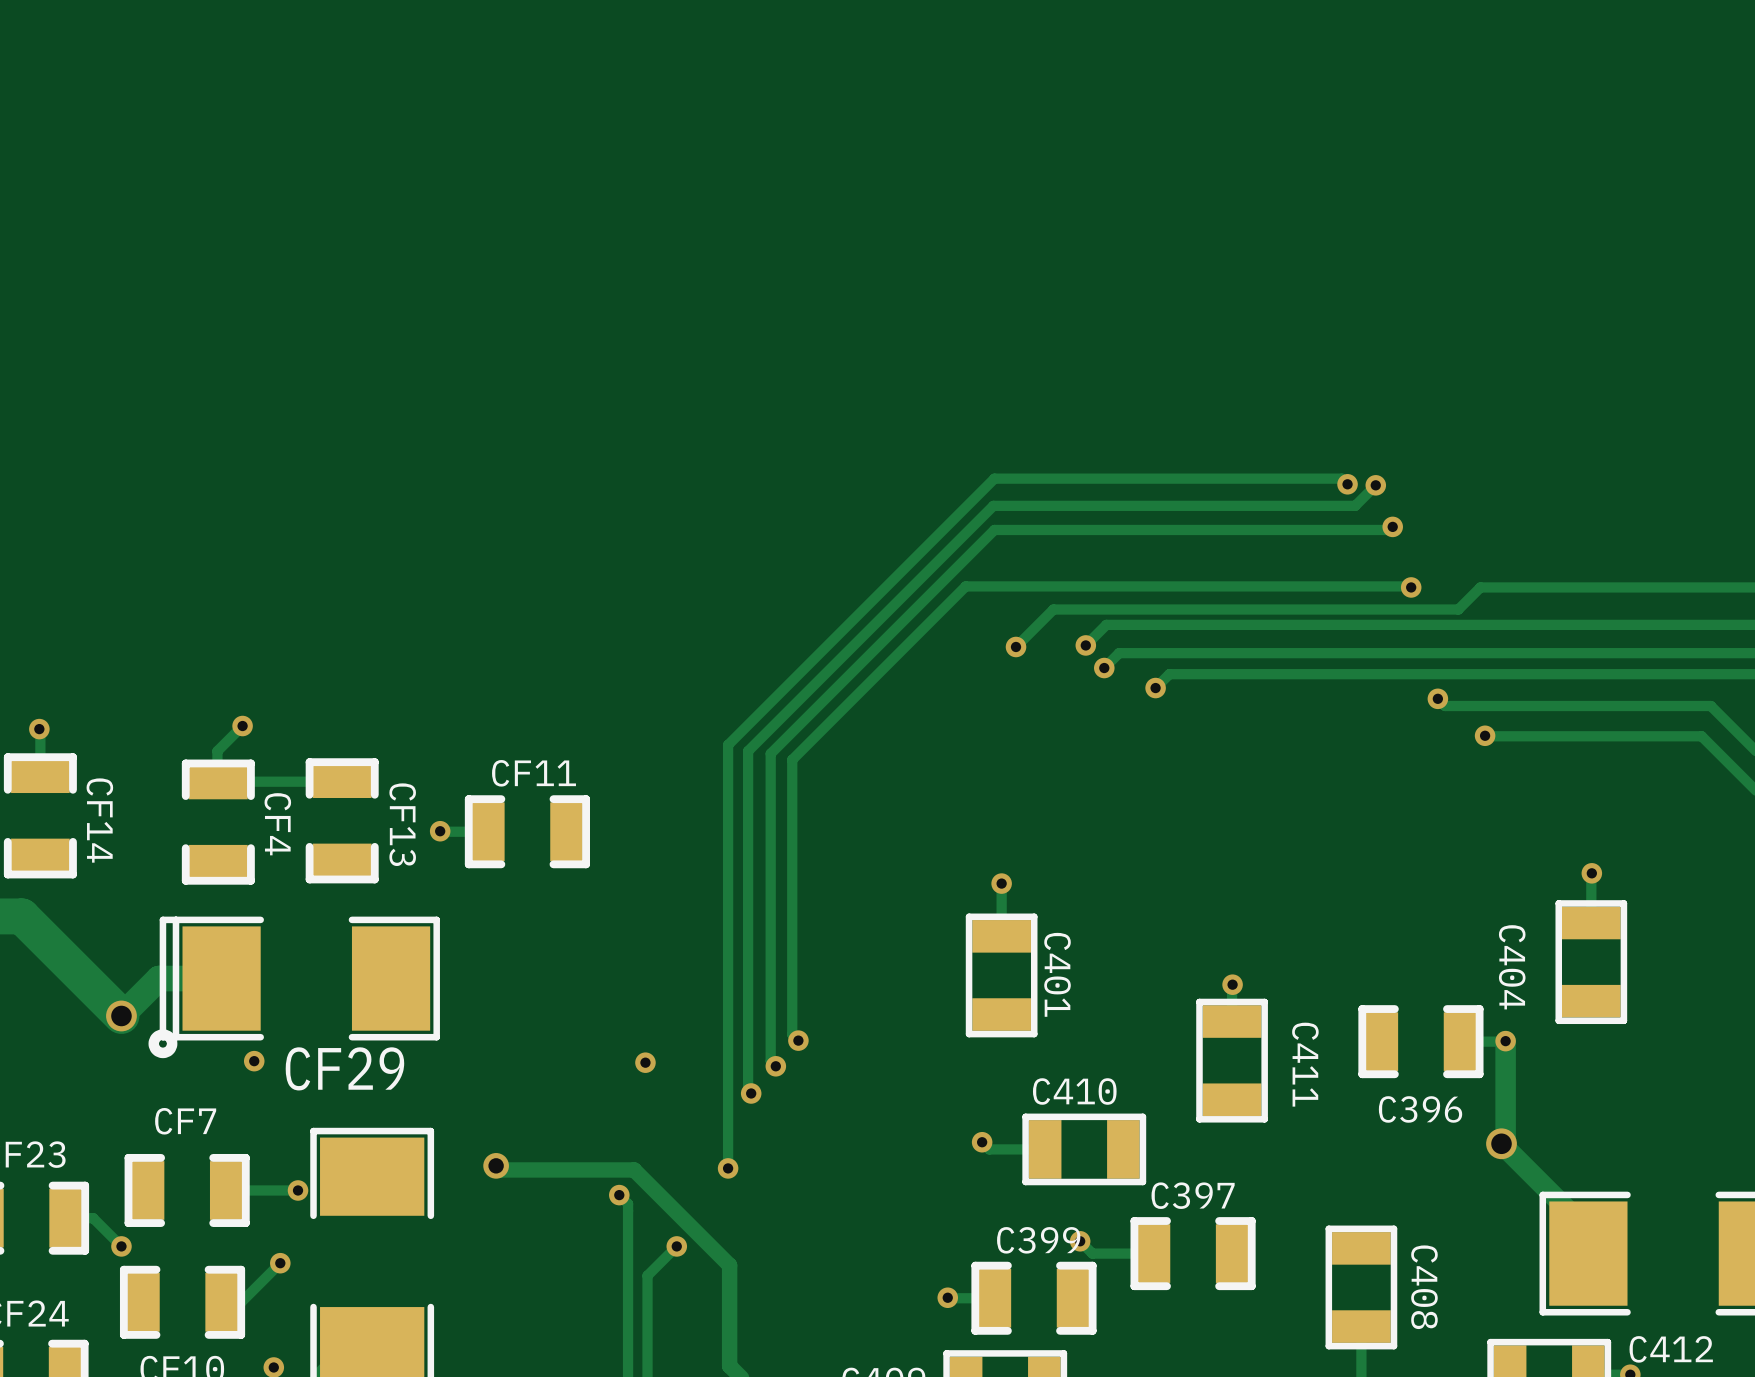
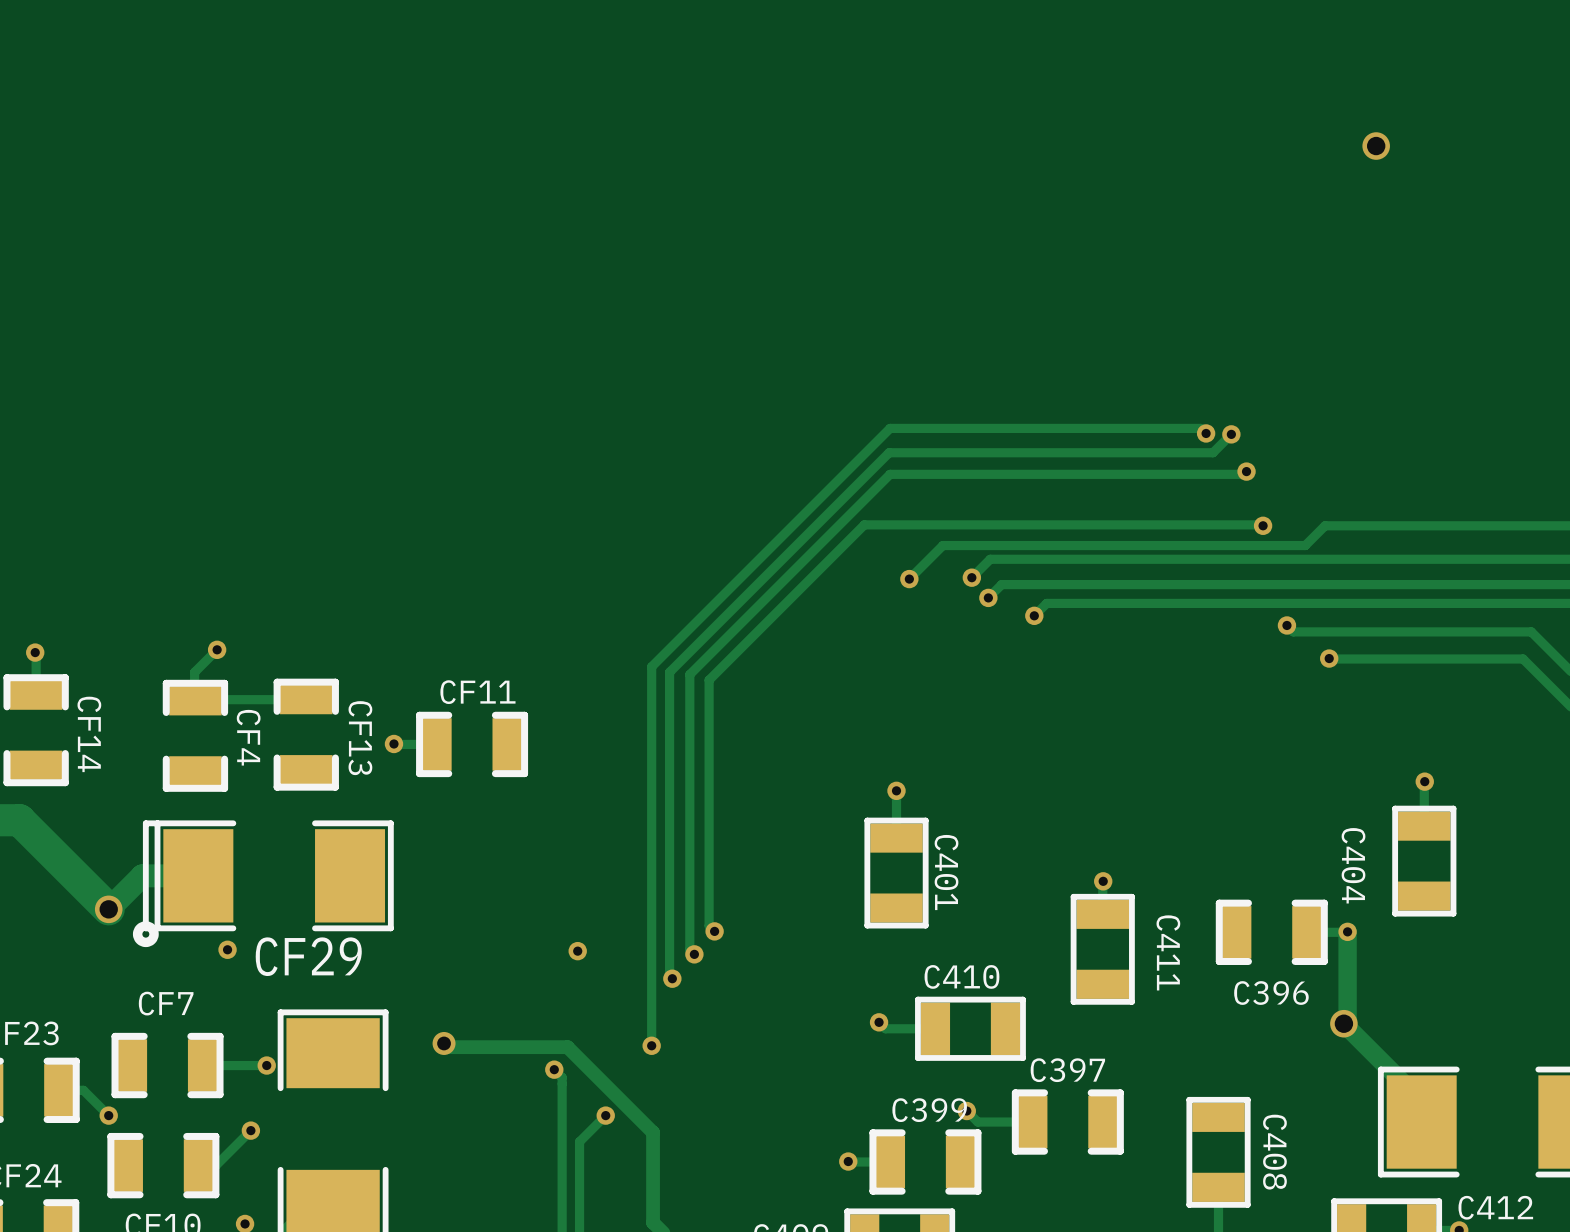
via: none -> (1376, 146)

